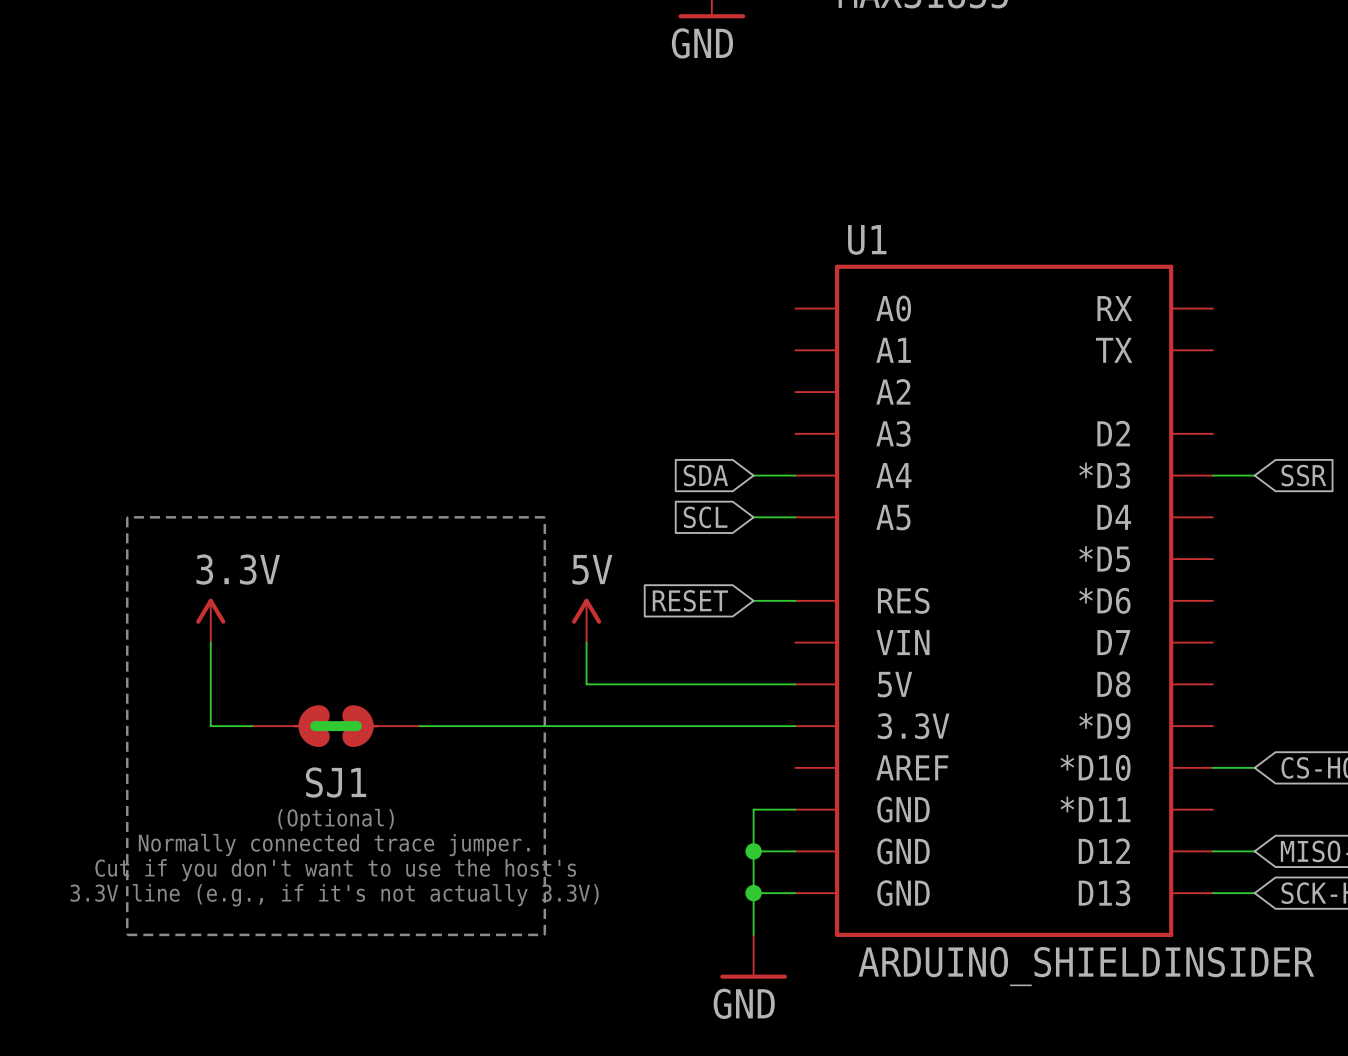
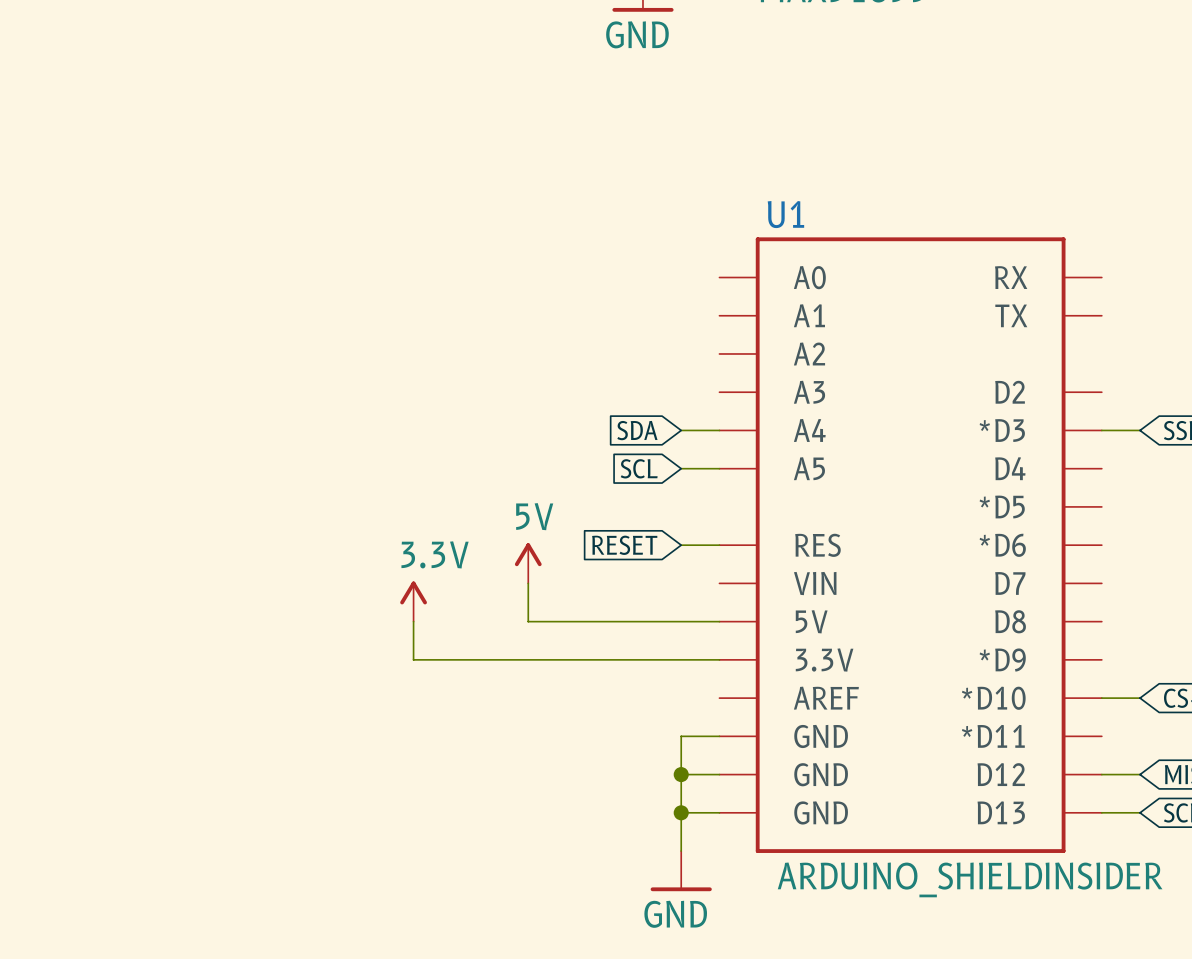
line: (127, 517) (544, 517) (544, 934) (127, 934) (127, 517) -> none
power symbol position: 3.3V (210, 620) -> 3.3V (413, 601)
wire: (210, 642) (210, 726) (252, 726) -> none
SJ1: (336, 726) -> none
wire: (419, 726) (461, 726) -> (413, 621) (413, 659)
text: (Optional) (336, 819) -> none
text: Normally connected trace jumper. (334, 845) -> none
text: Cut if you don't want to use the host's (335, 870) -> none
text: 3.3V line (e.g., if it's not actually 3.3V) (334, 895) -> none

